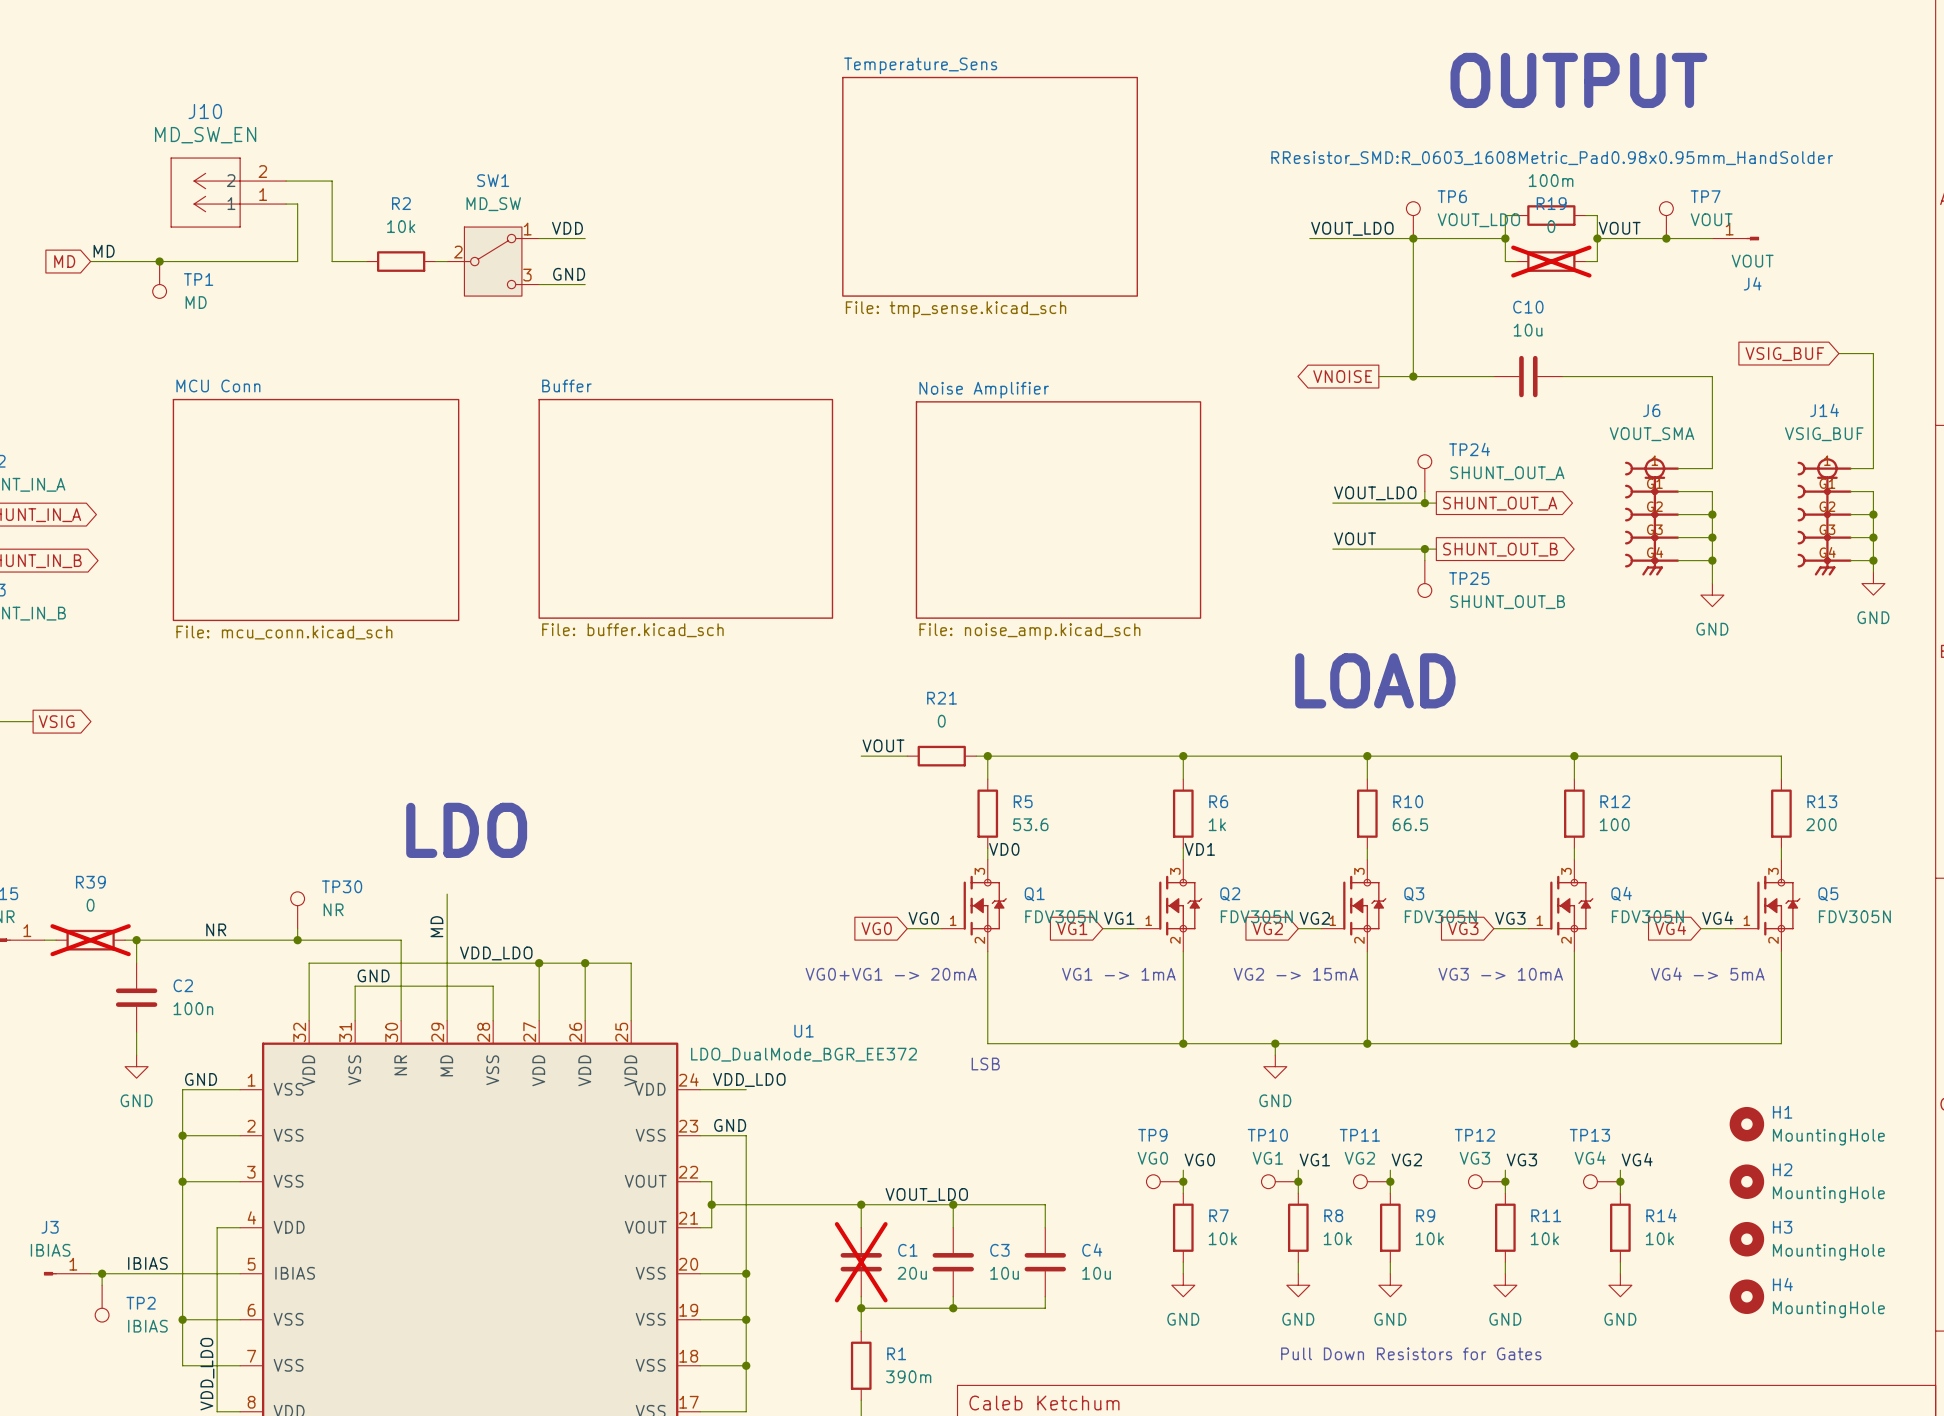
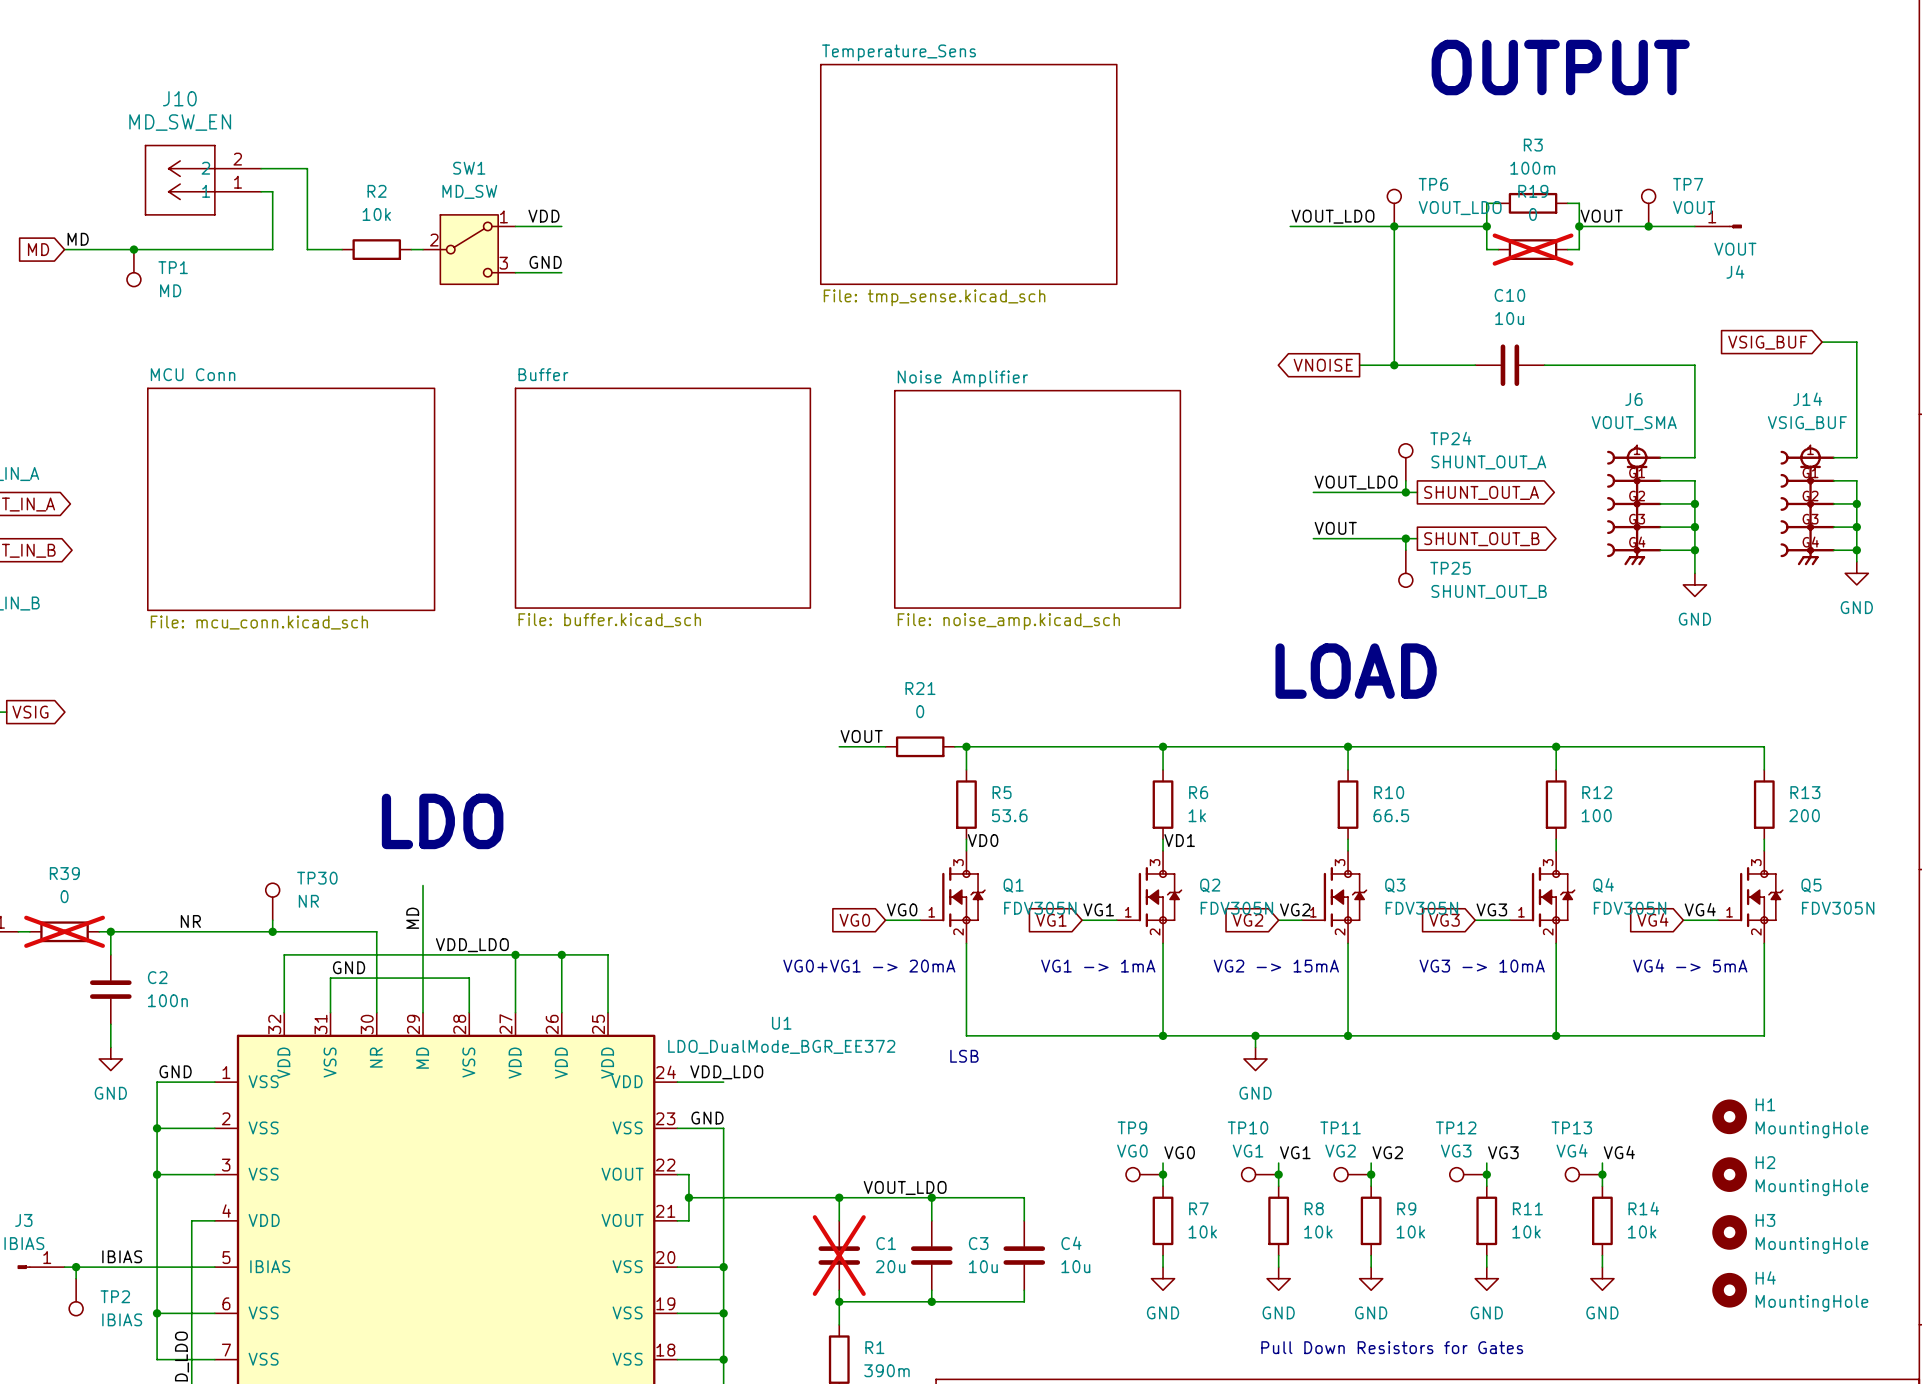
R3 name: RResistor_SMD:R_0603_1608Metric_Pad0.98x0.95mm_HandSolder (1552, 158) -> R3 (1533, 145)

